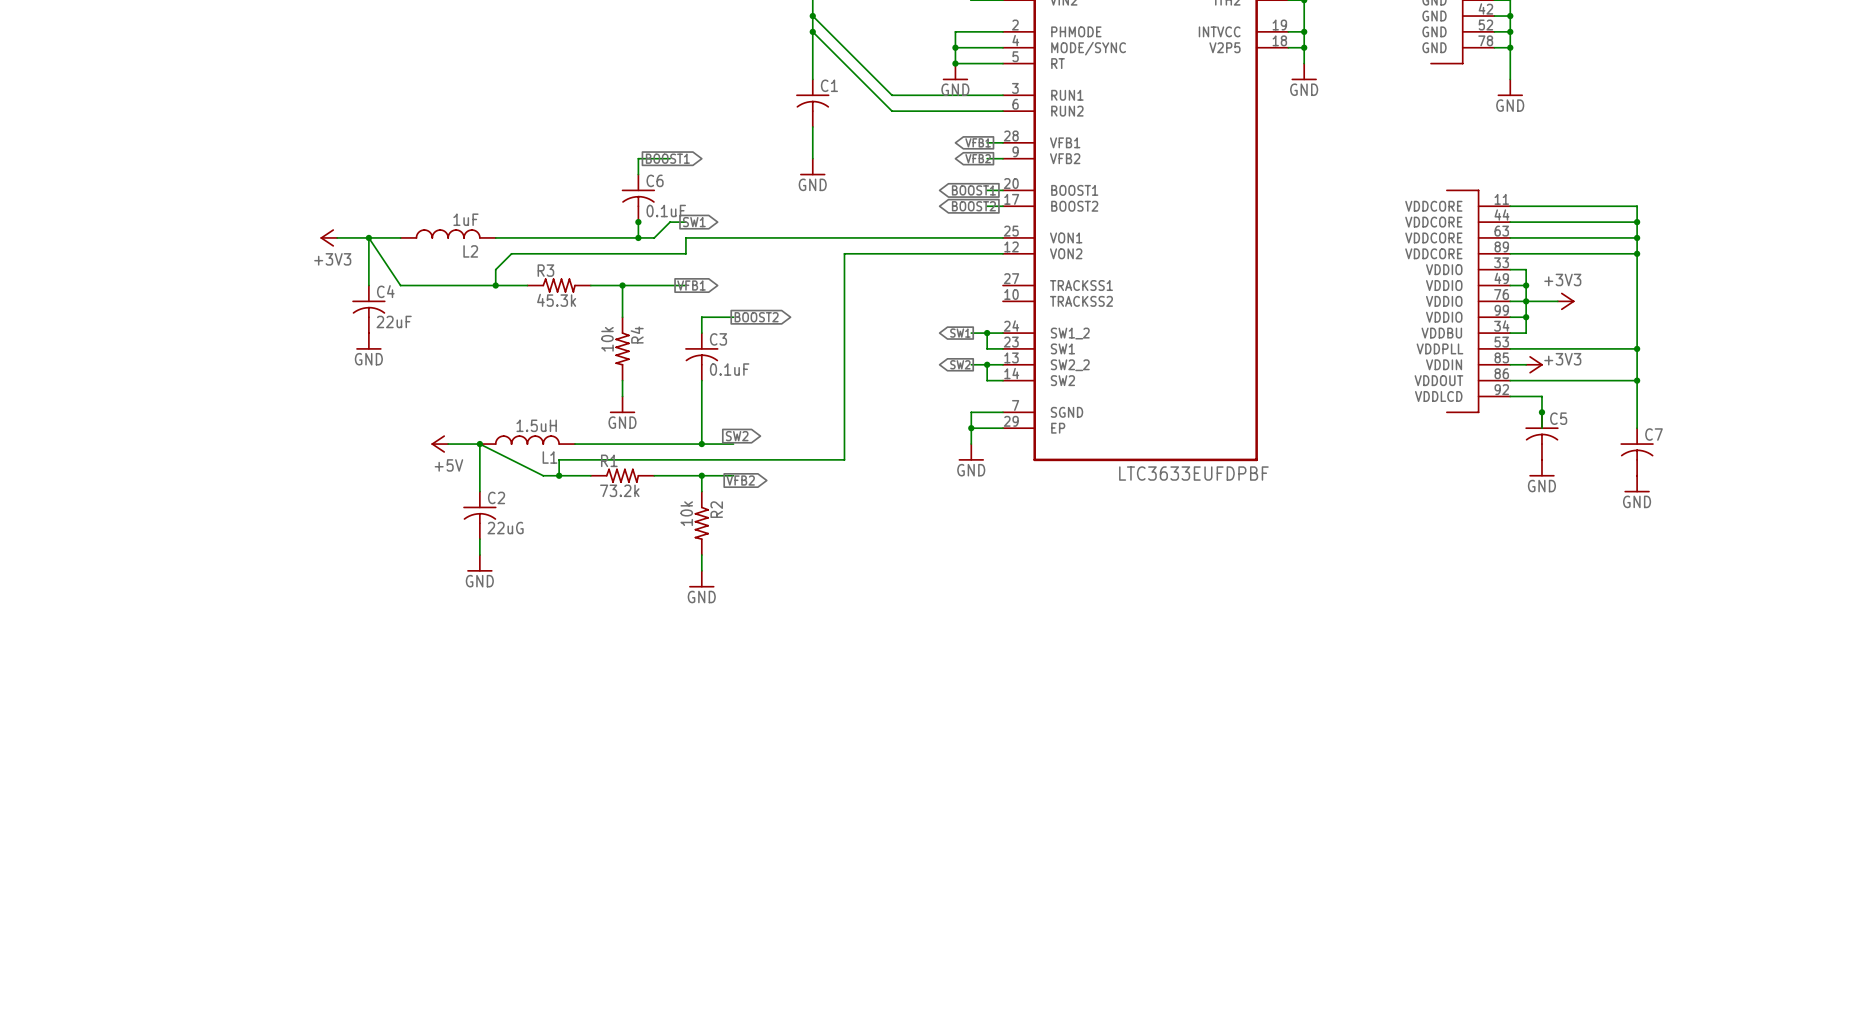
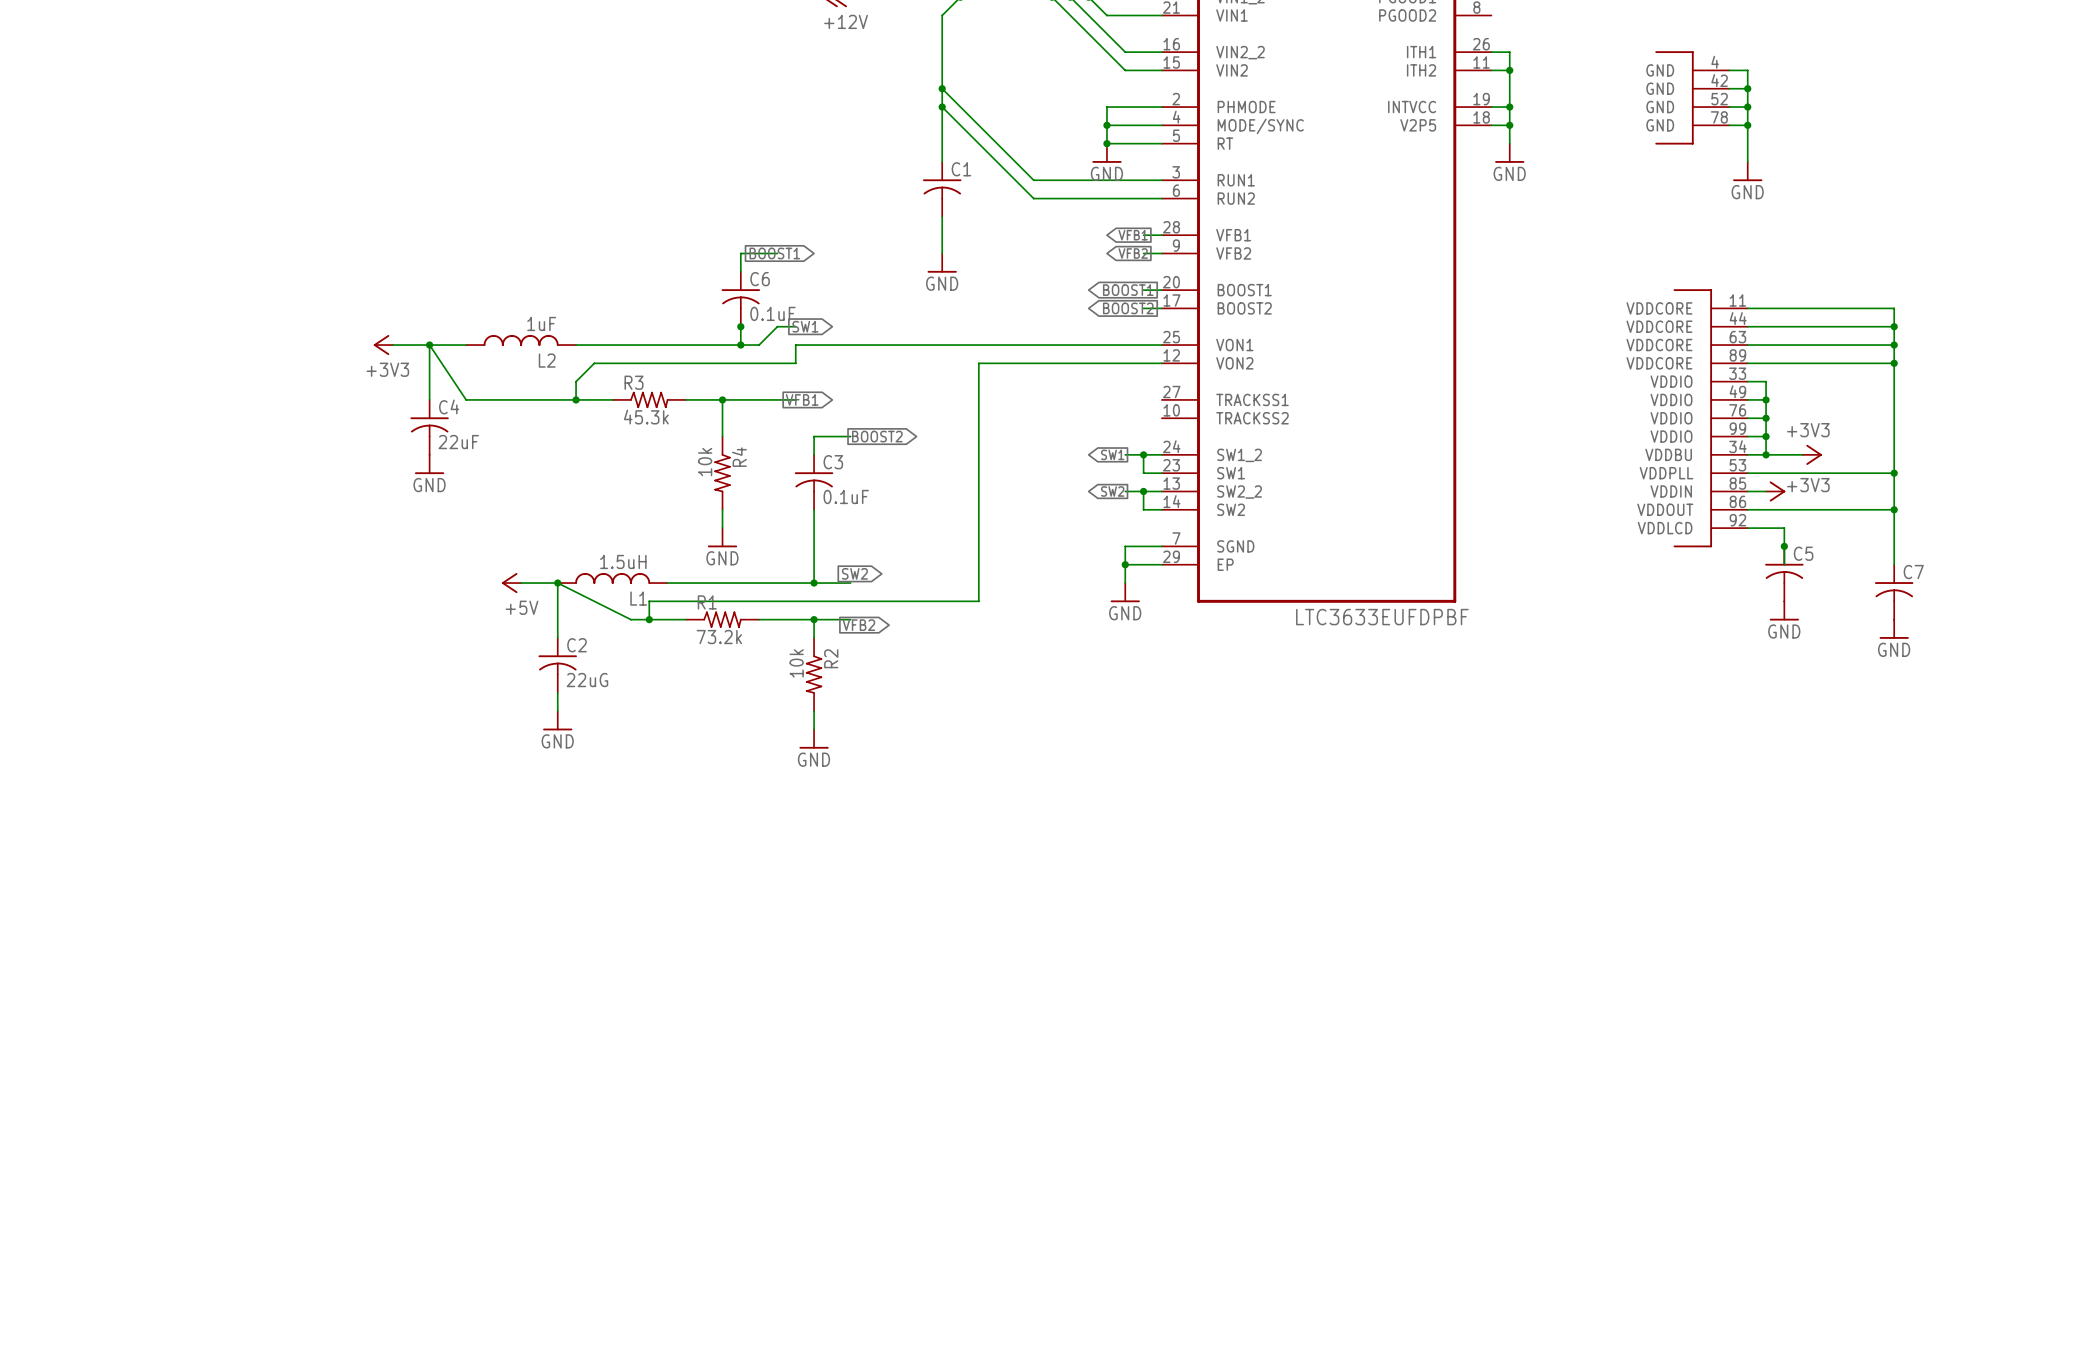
wire: (1526, 301) (1557, 301) -> (1766, 454) (1802, 454)
power symbol position: +3V3 (1566, 301) -> +3V3 (1812, 454)
junction: none -> (1766, 454)

